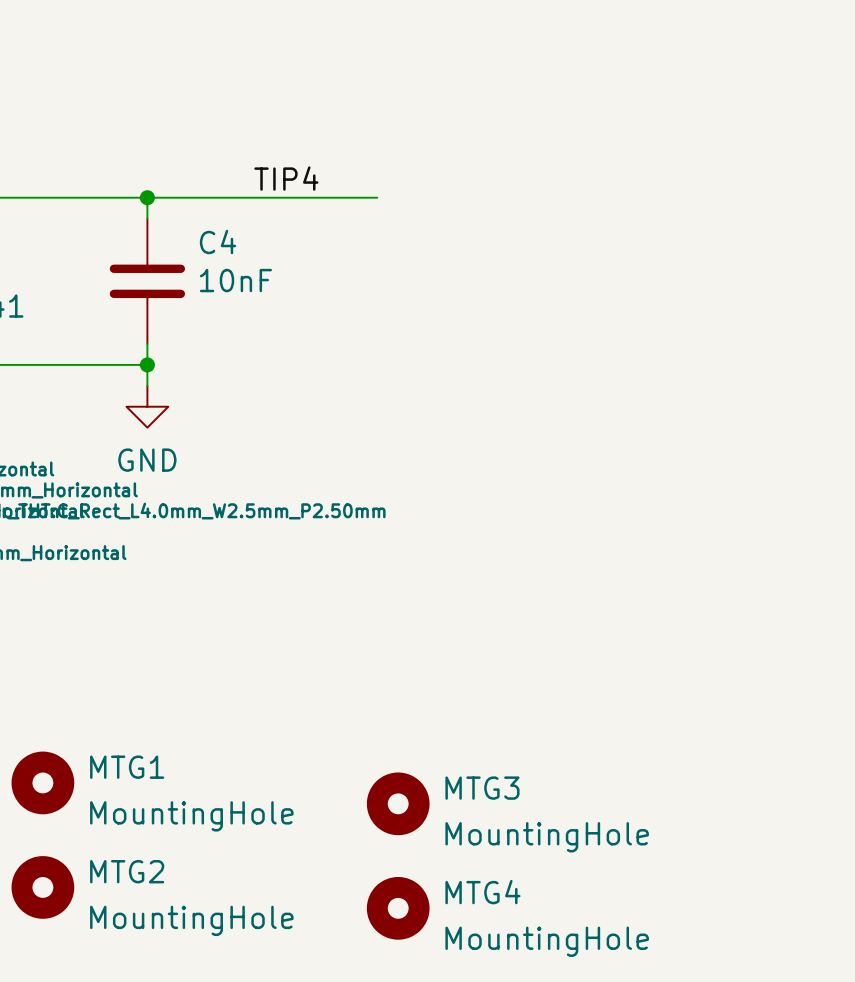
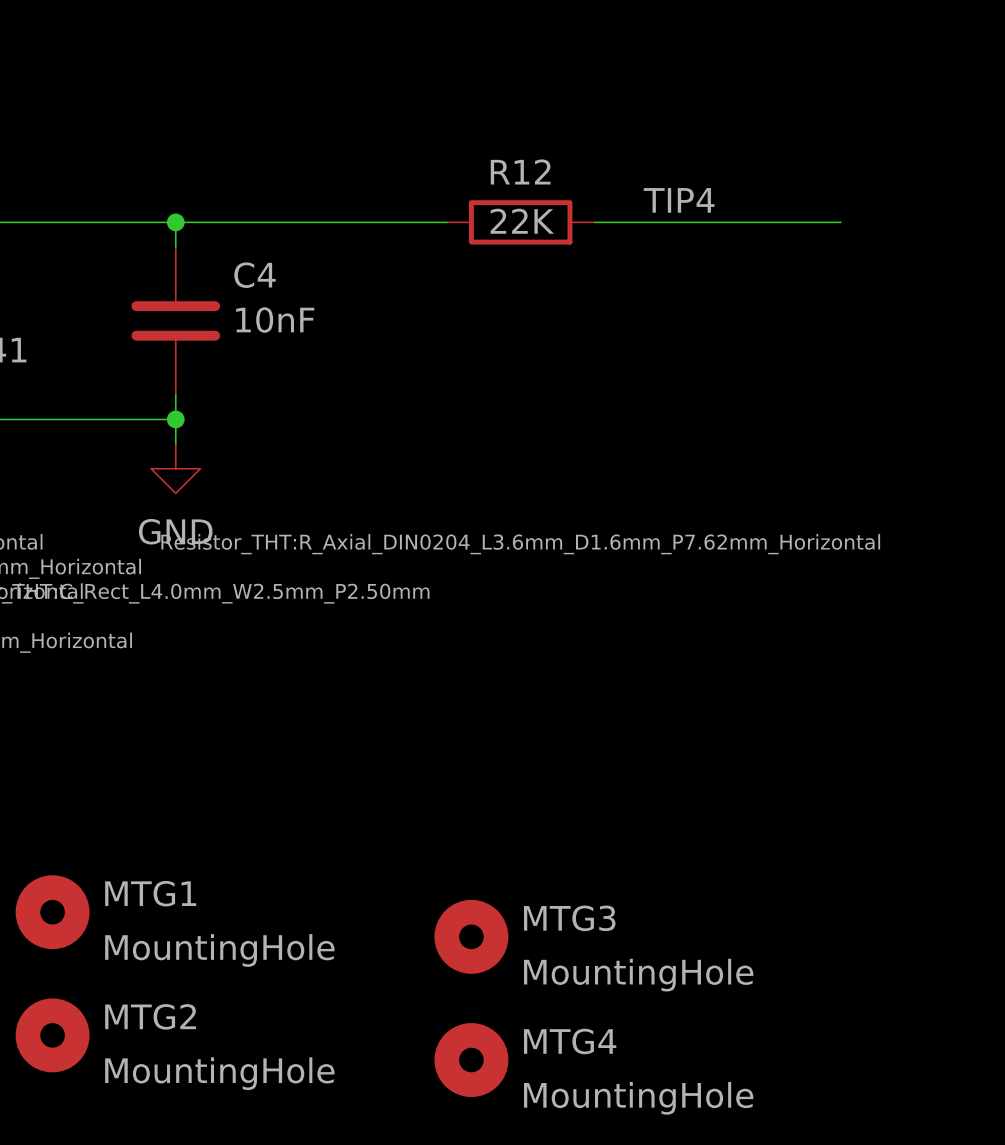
label position: TIP4 (286, 178) -> TIP4 (679, 200)
R12: none -> 22K (520, 222)
wire: none -> (594, 222) (840, 222)

